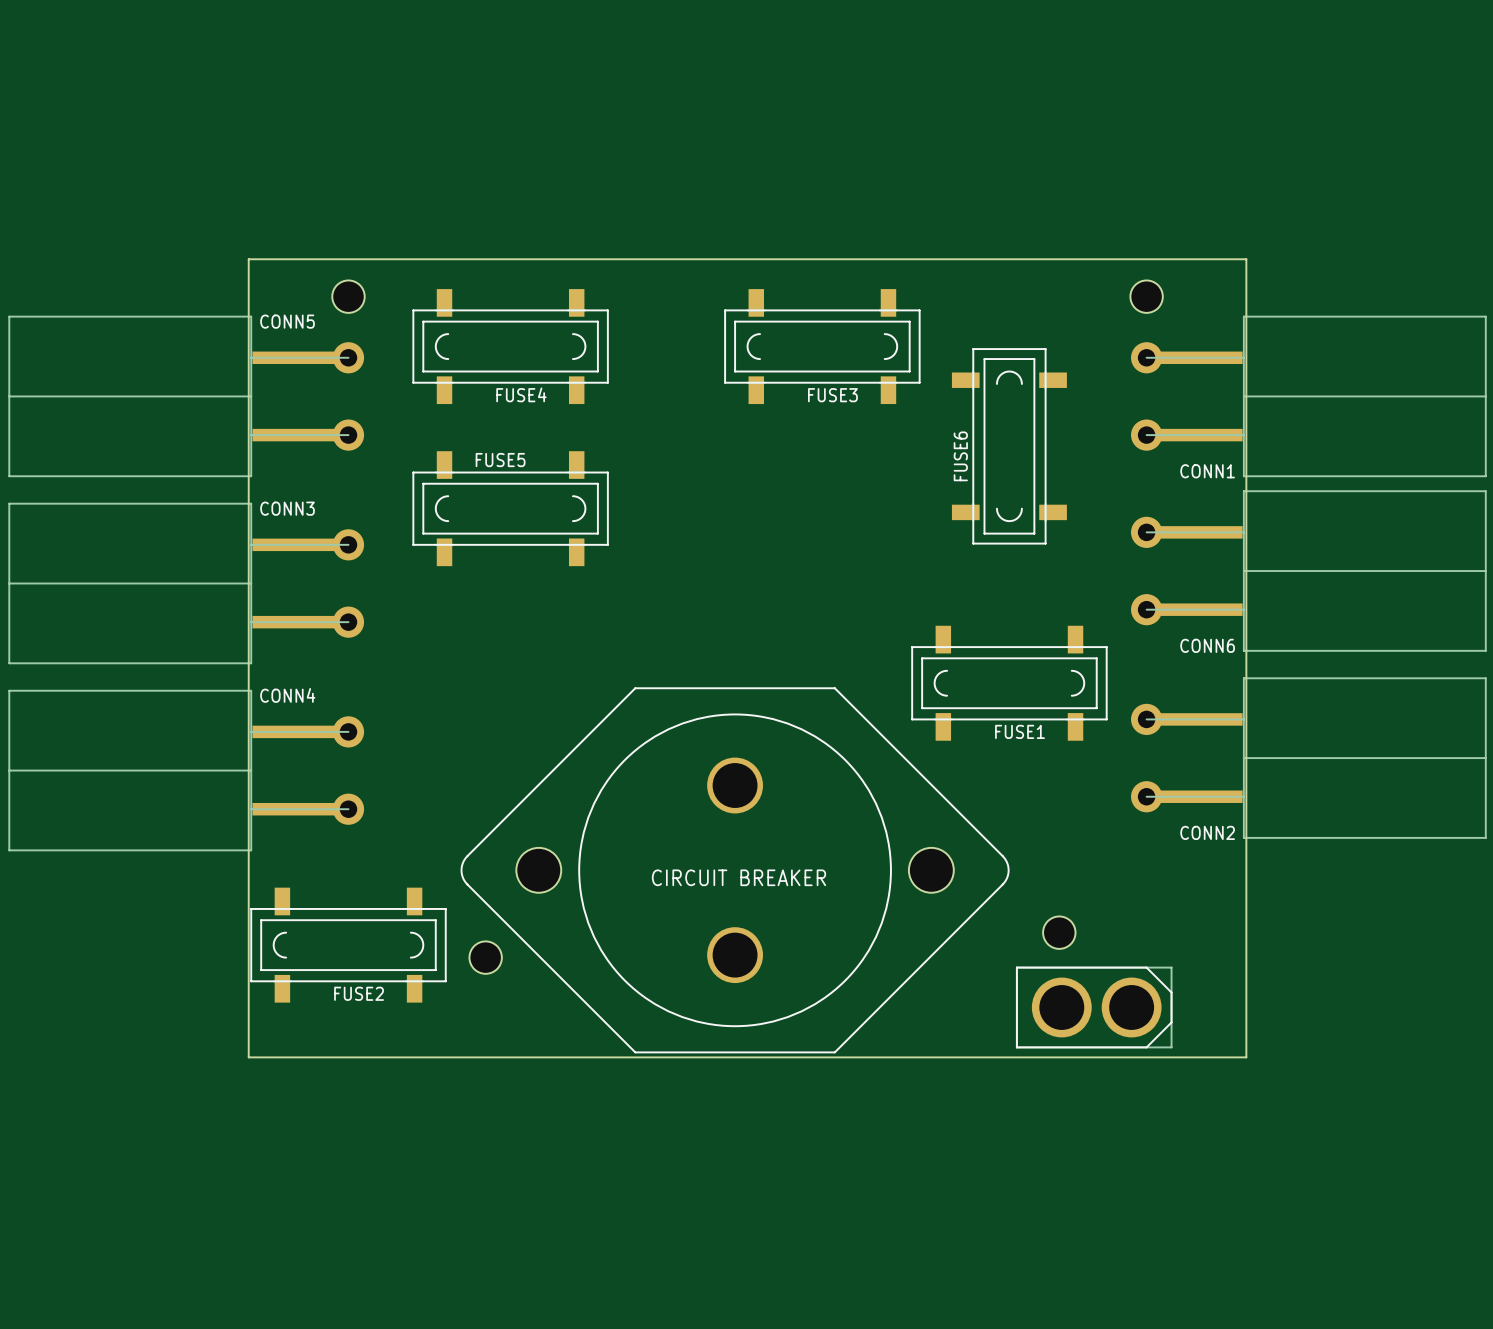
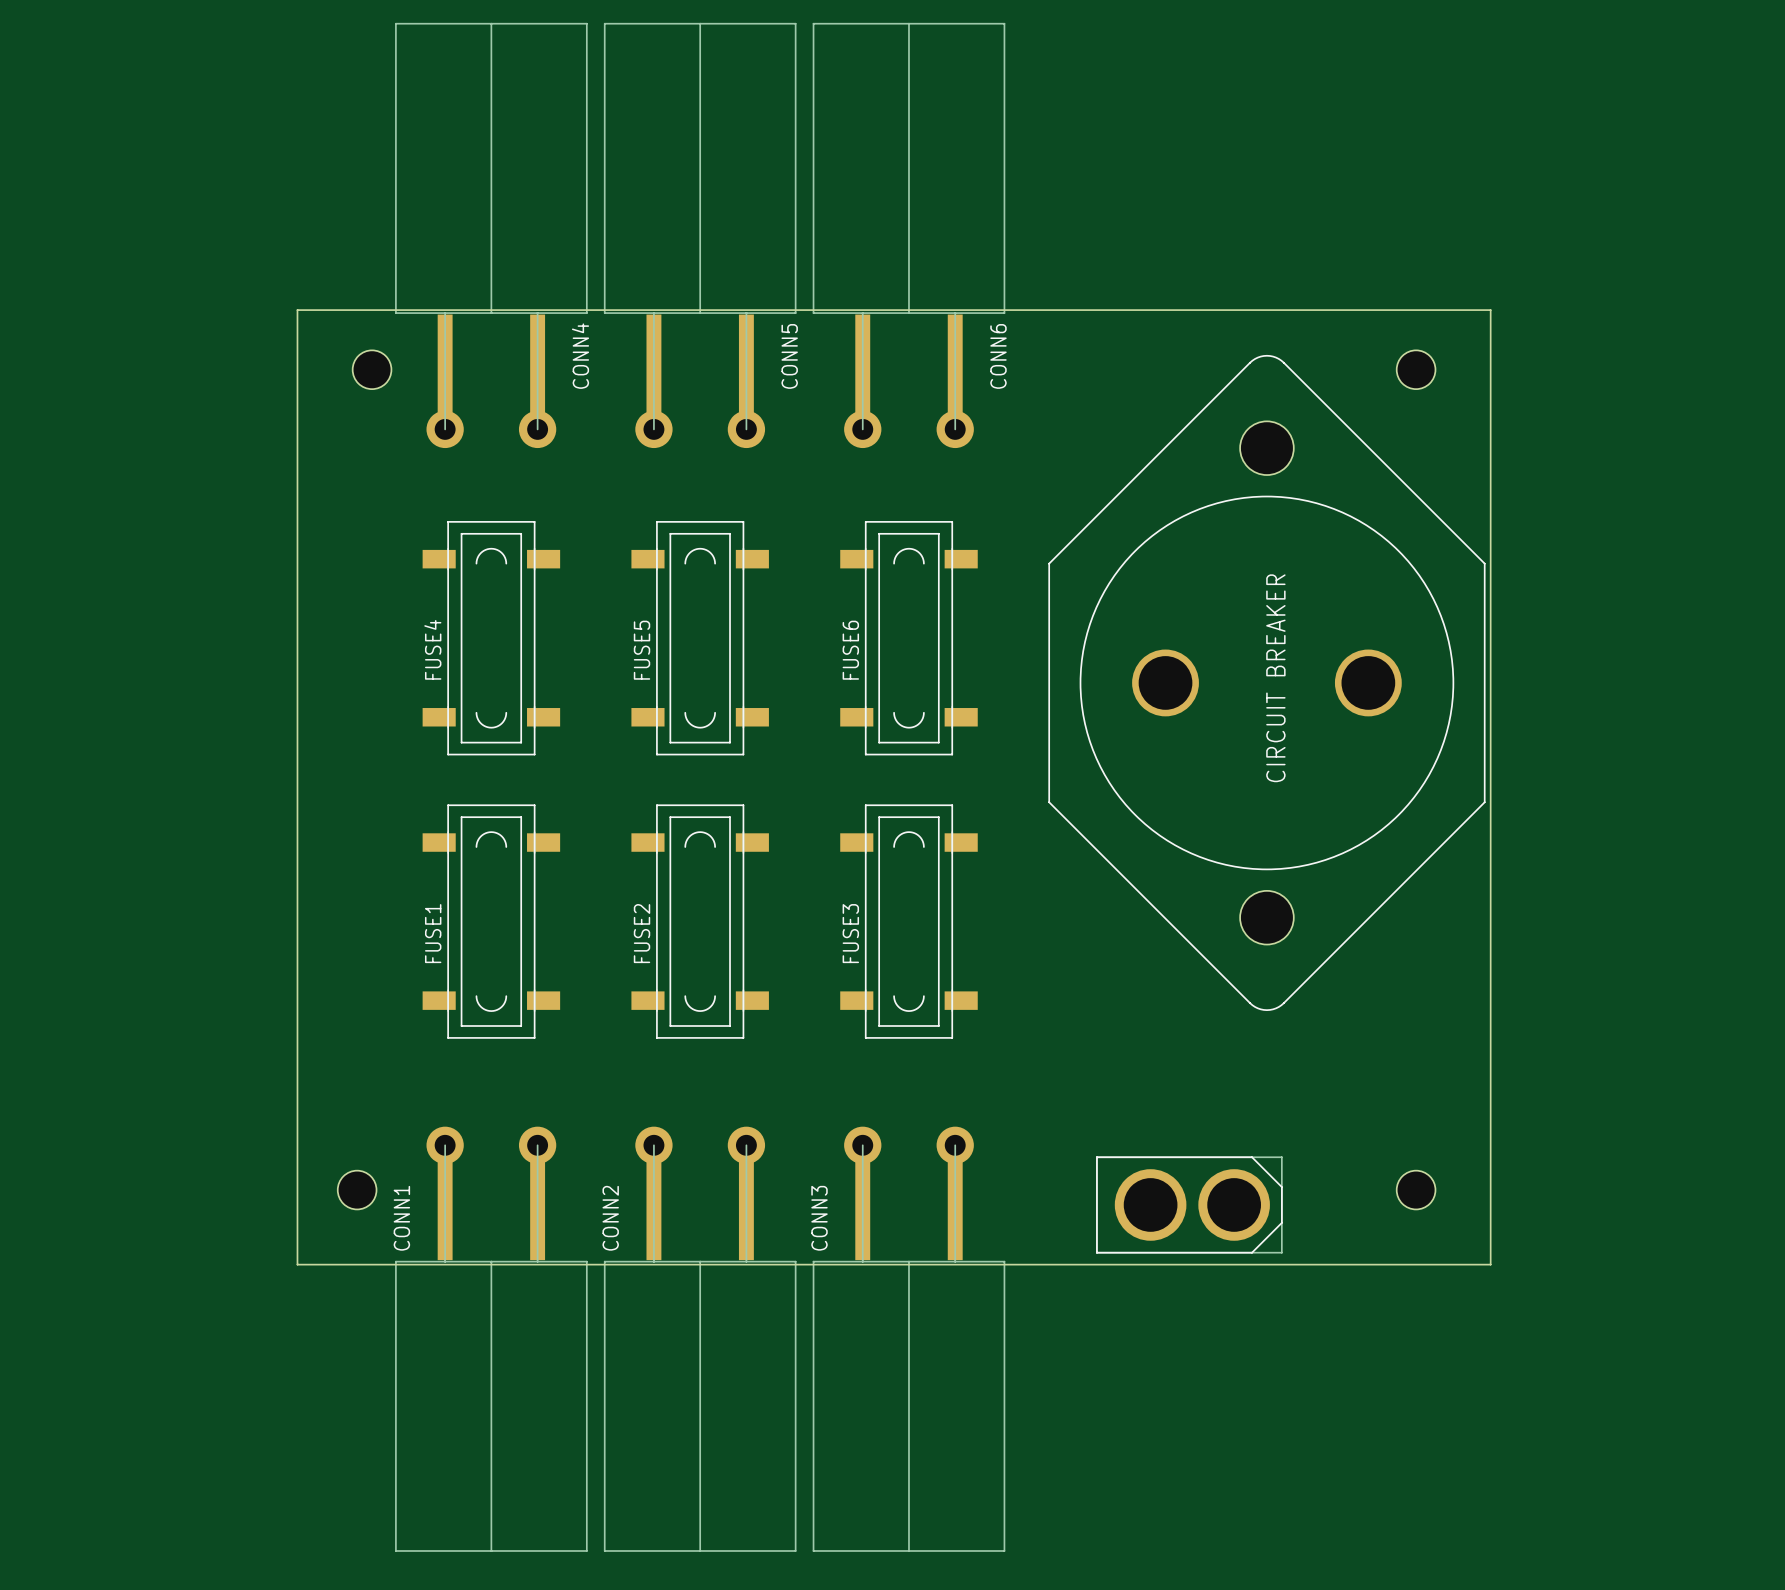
part position: (348, 296) -> (372, 369)
part position: (1146, 296) -> (1416, 369)
FUSE4 rotation: 0° (510, 346) -> 90° clockwise (491, 638)
FUSE4 position: (510, 346) -> (491, 638)
FUSE3 rotation: 0° (822, 346) -> 90° clockwise (908, 921)
FUSE3 position: (822, 346) -> (908, 921)
CONN5 rotation: 0° (186, 396) -> 90° clockwise (700, 235)
CONN5 position: (186, 396) -> (700, 235)
CONN1 rotation: 0° (1308, 396) -> 90° clockwise (491, 1339)
CONN1 position: (1308, 396) -> (491, 1339)
FUSE6 position: (1009, 446) -> (908, 638)
FUSE5 name position: FUSE5 (500, 460) -> FUSE5 (642, 650)
FUSE5 rotation: 0° (510, 508) -> 90° clockwise (700, 638)
part: none -> (1266, 682)
CONN6 rotation: 0° (1308, 571) -> 90° counterclockwise (908, 235)
CONN6 position: (1308, 571) -> (908, 235)
CONN3 rotation: 0° (186, 583) -> 90° counterclockwise (908, 1339)
CONN3 position: (186, 583) -> (908, 1339)
FUSE1 rotation: 0° (1009, 683) -> 90° clockwise (491, 921)
FUSE1 position: (1009, 683) -> (491, 921)
CONN2 rotation: 0° (1308, 758) -> 90° clockwise (700, 1339)
CONN2 position: (1308, 758) -> (700, 1339)
CONN4 rotation: 0° (186, 770) -> 90° clockwise (491, 235)
CONN4 position: (186, 770) -> (491, 235)
part: (735, 870) -> none
part position: (1059, 932) -> (1416, 1190)
FUSE2 rotation: 0° (348, 945) -> 90° clockwise (700, 921)
FUSE2 position: (348, 945) -> (700, 921)
part position: (485, 957) -> (357, 1190)
part position: (1094, 1007) -> (1189, 1204)

